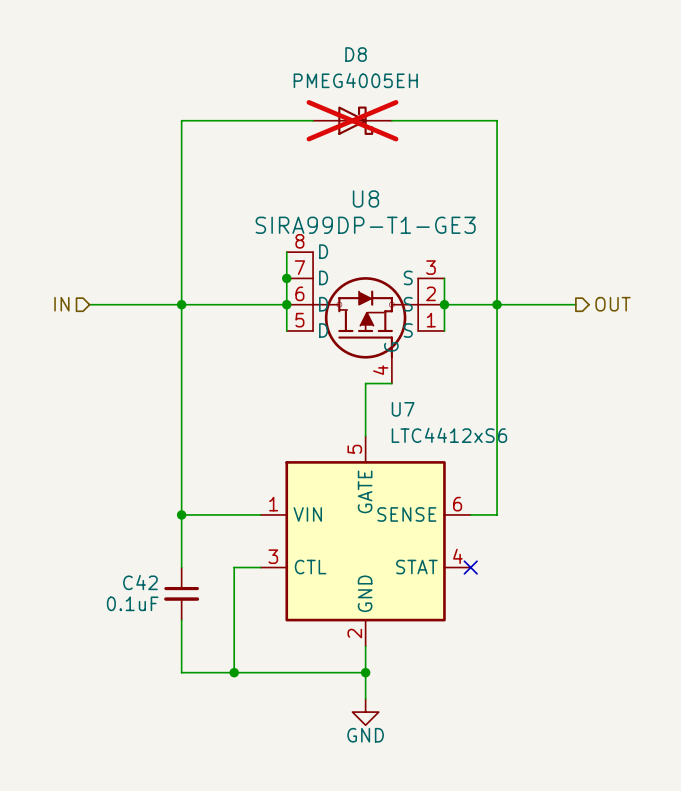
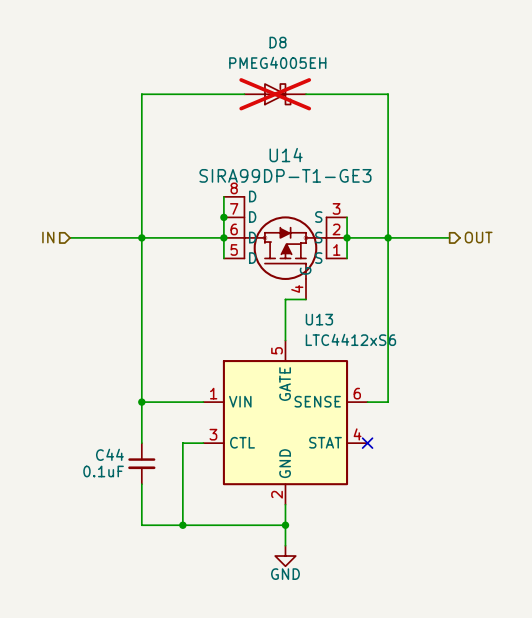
U8 name: U8 (365, 198) -> U14 (286, 155)
U7 name: U7 (403, 409) -> U13 (319, 319)
C42 name: C42 (140, 582) -> C44 (109, 454)

